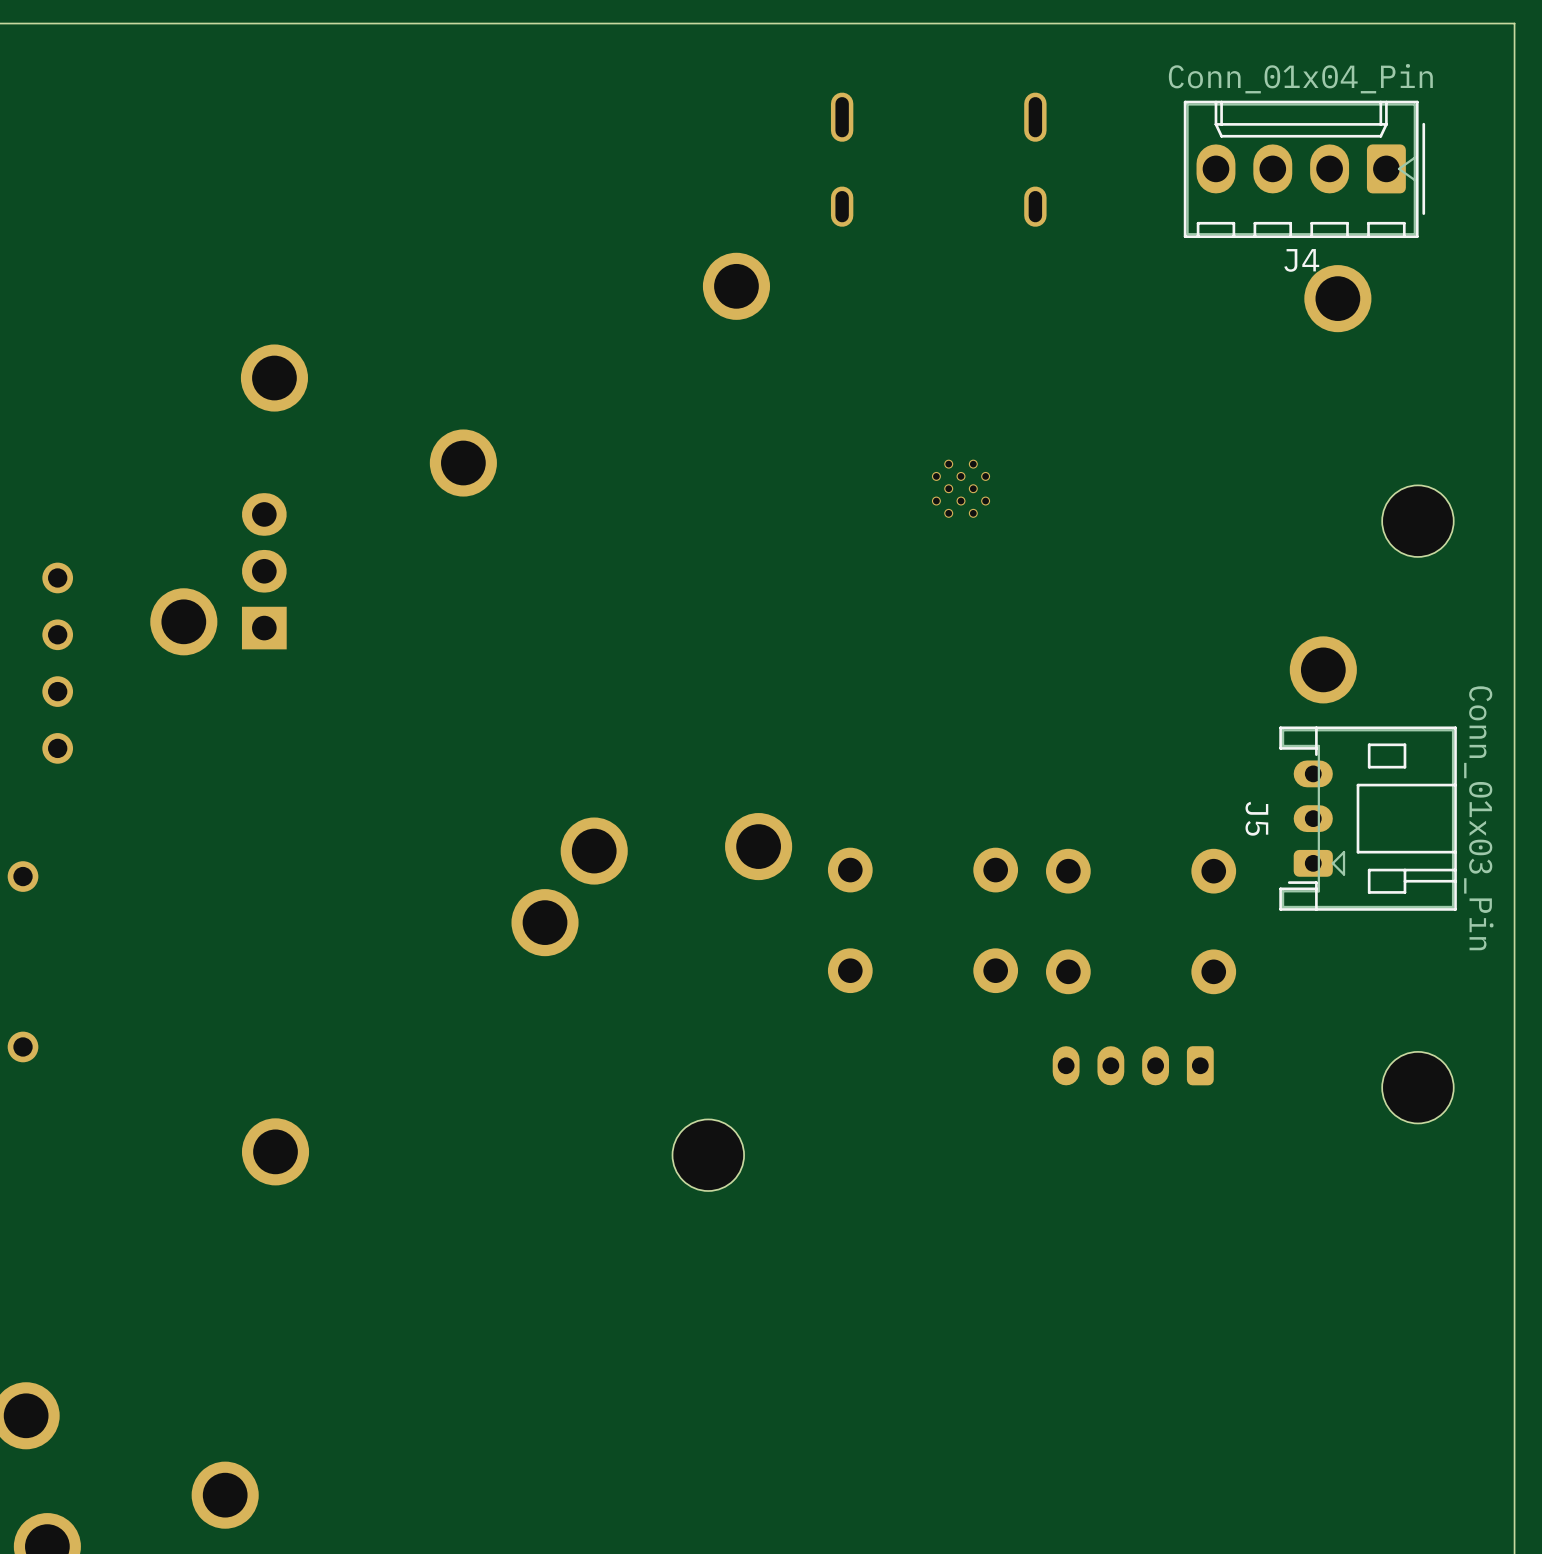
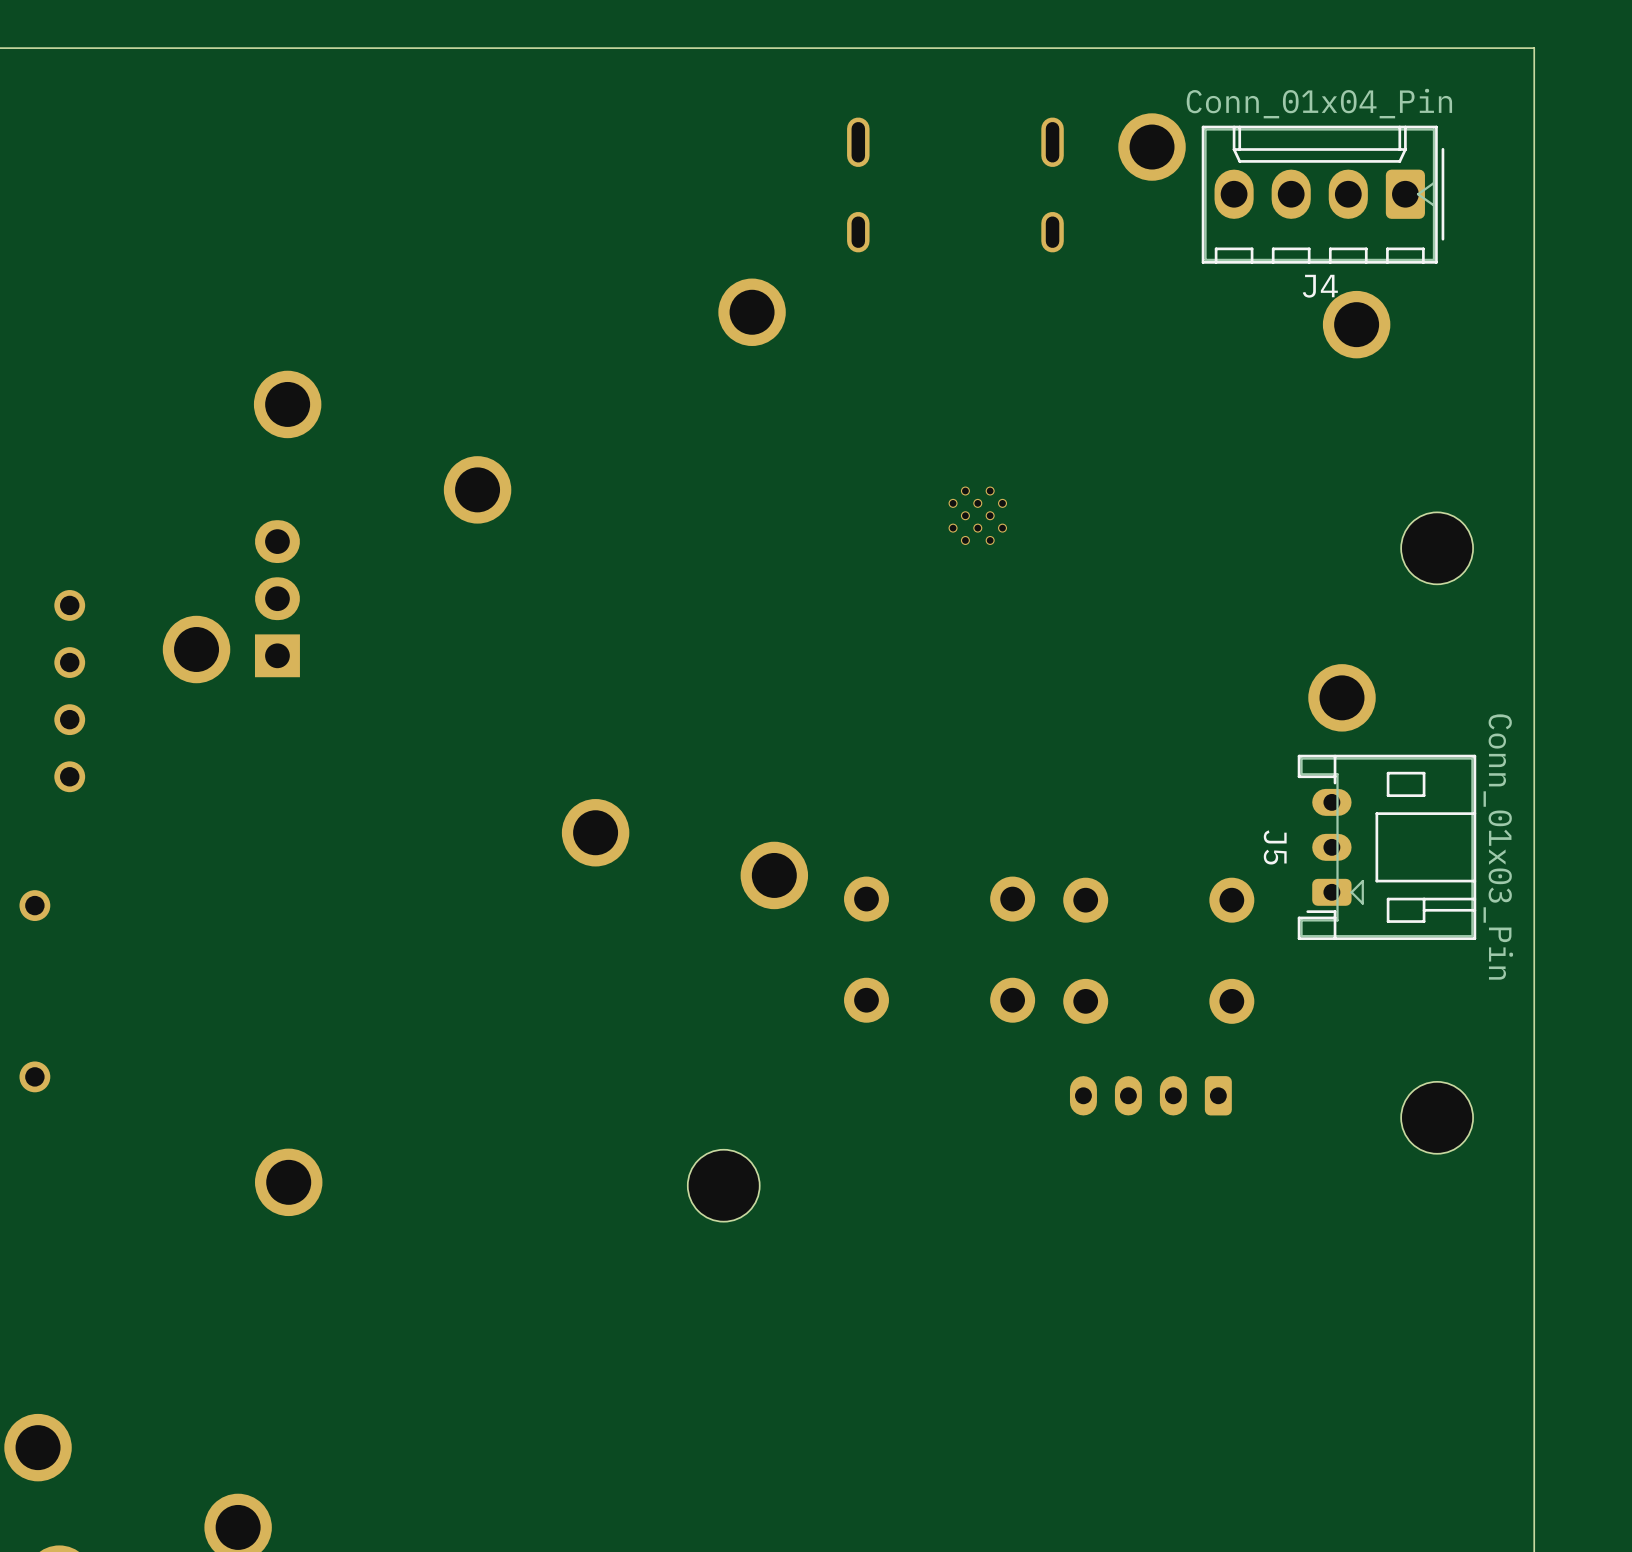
part: none -> (1152, 147)
part position: (594, 851) -> (595, 832)
part: (545, 922) -> none

